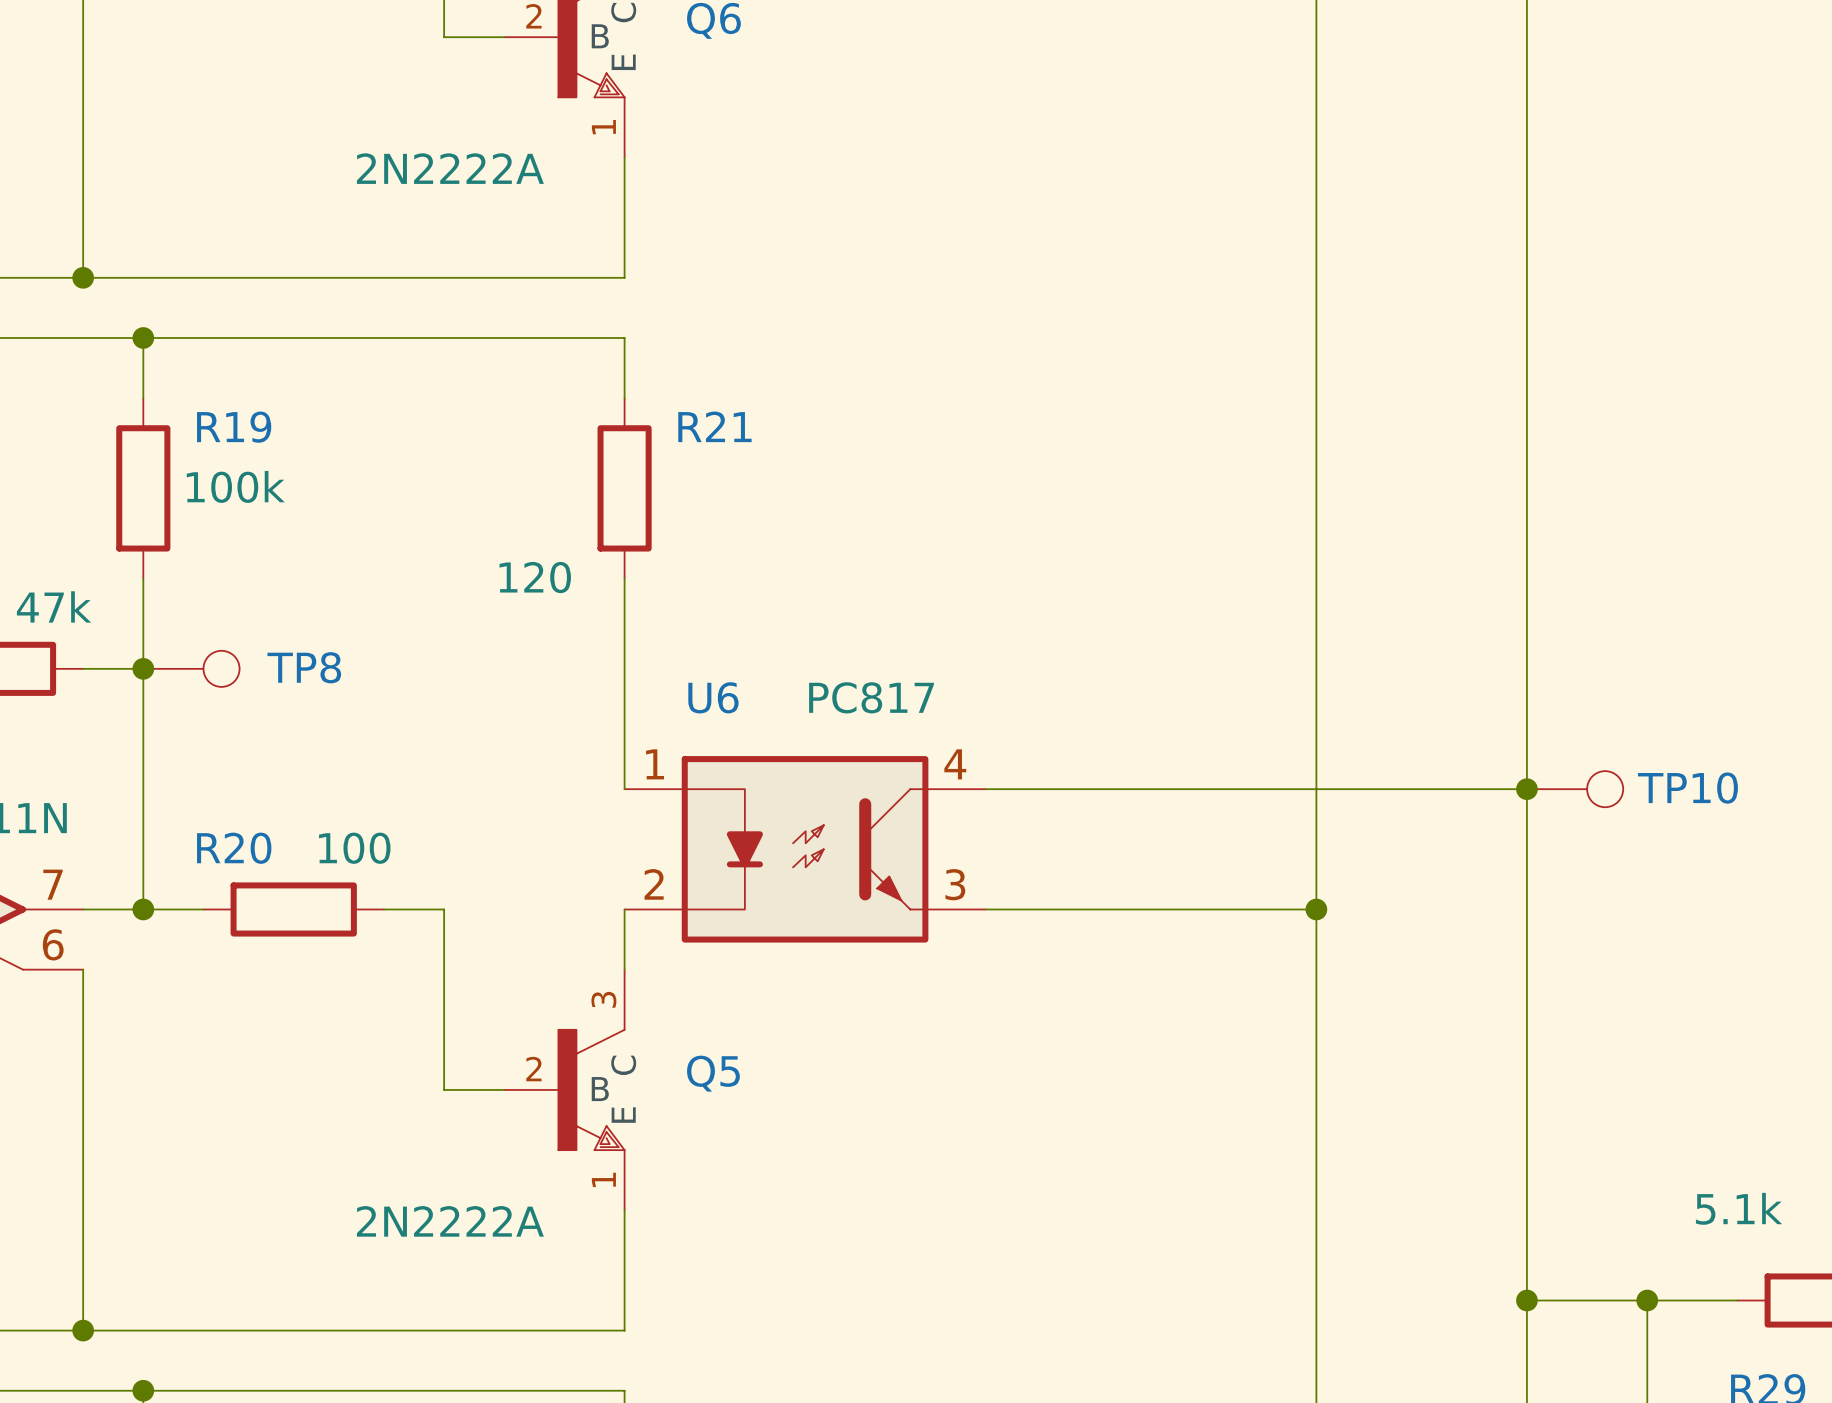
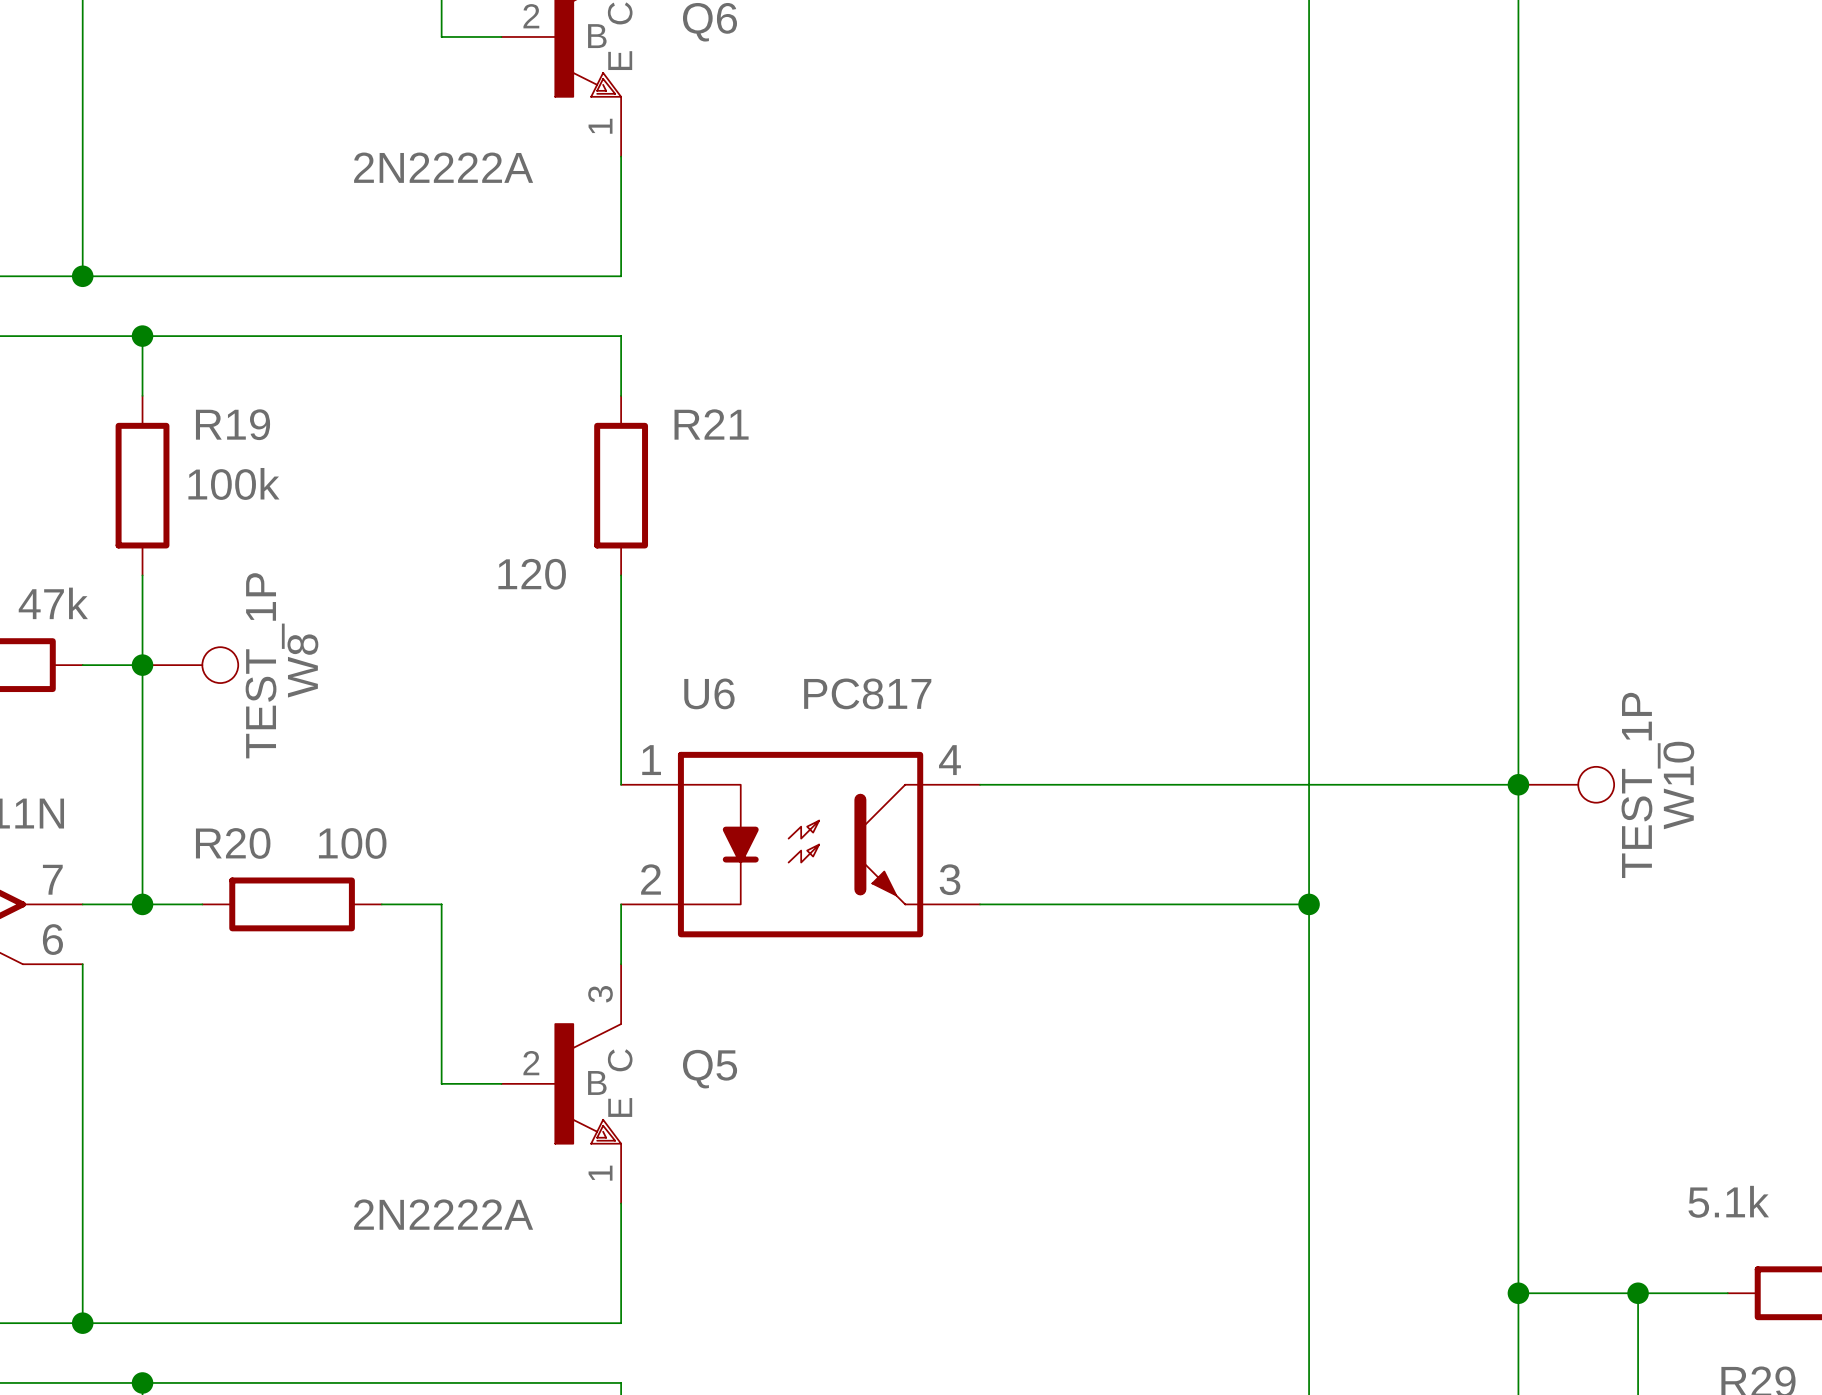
TP8 name: TP8 (304, 667) -> W8 (302, 665)
TP8 value: none -> TEST_1P (265, 665)
TP10 name: TP10 (1687, 788) -> W10 (1678, 785)
TP10 value: none -> TEST_1P (1641, 785)

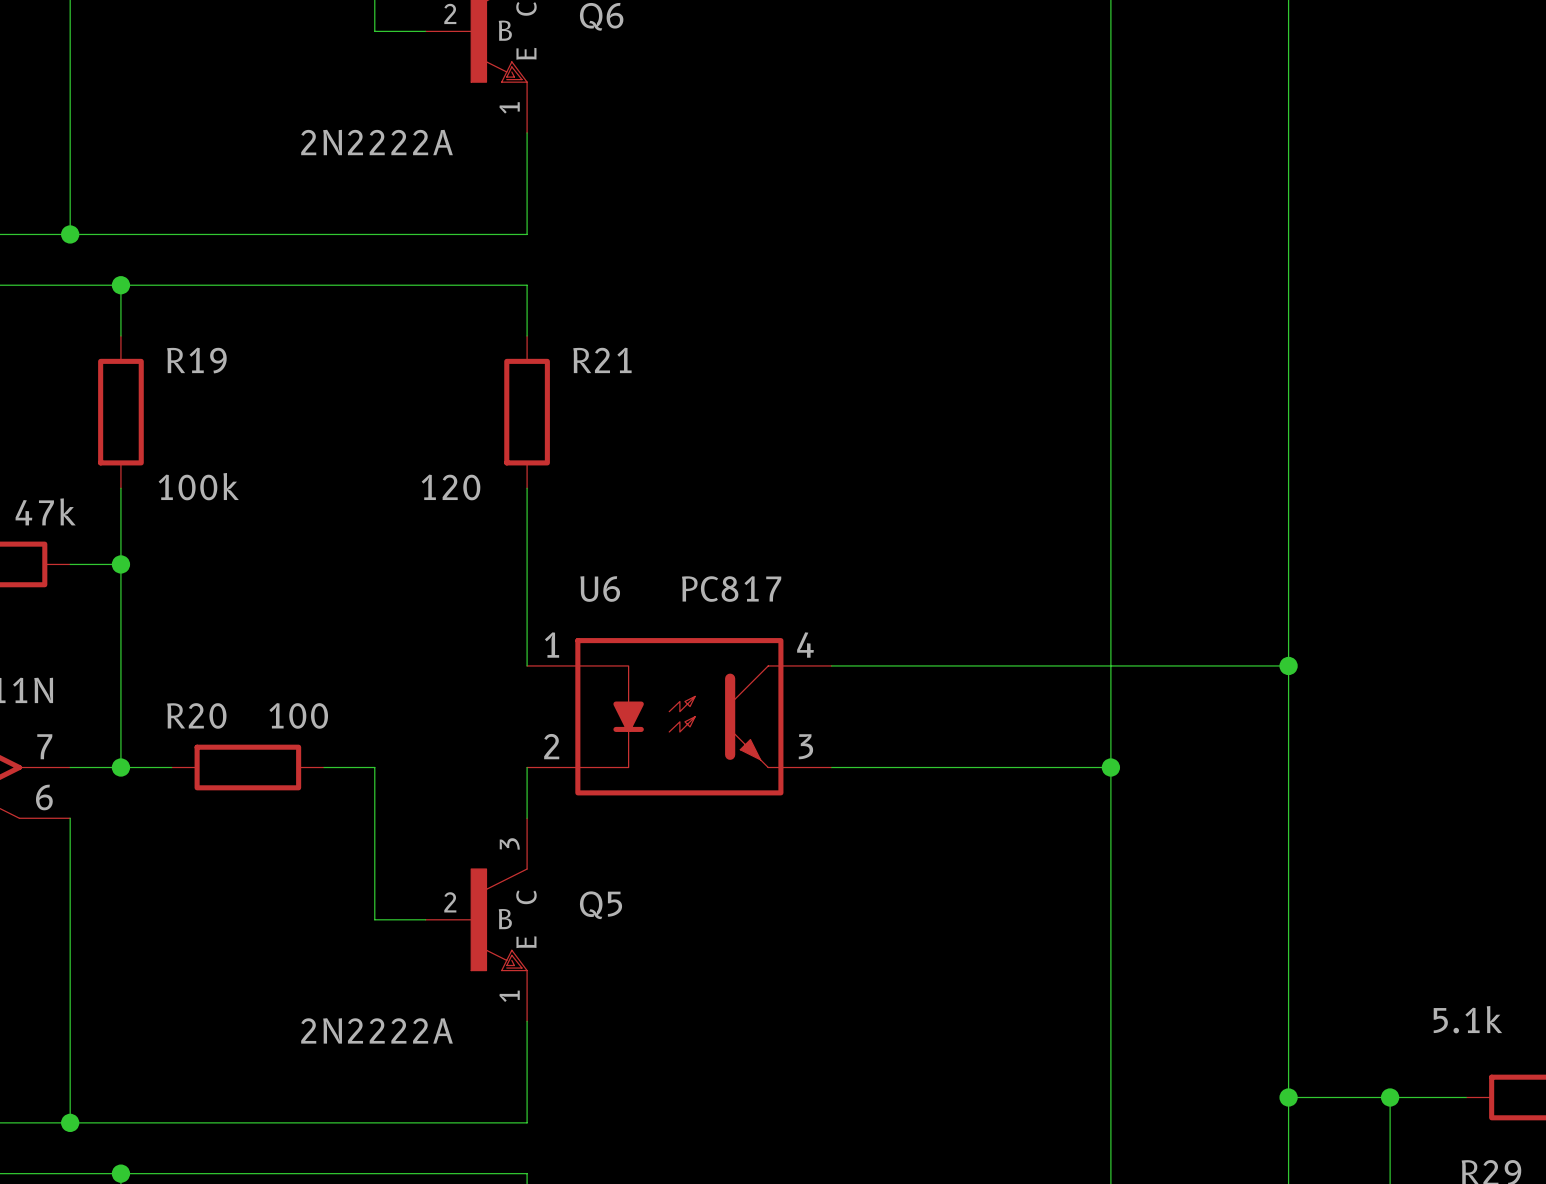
R19 value position: 100k (233, 483) -> 100k (198, 486)
W8: TEST_1P (190, 665) -> none
W10: TEST_1P (1566, 784) -> none

